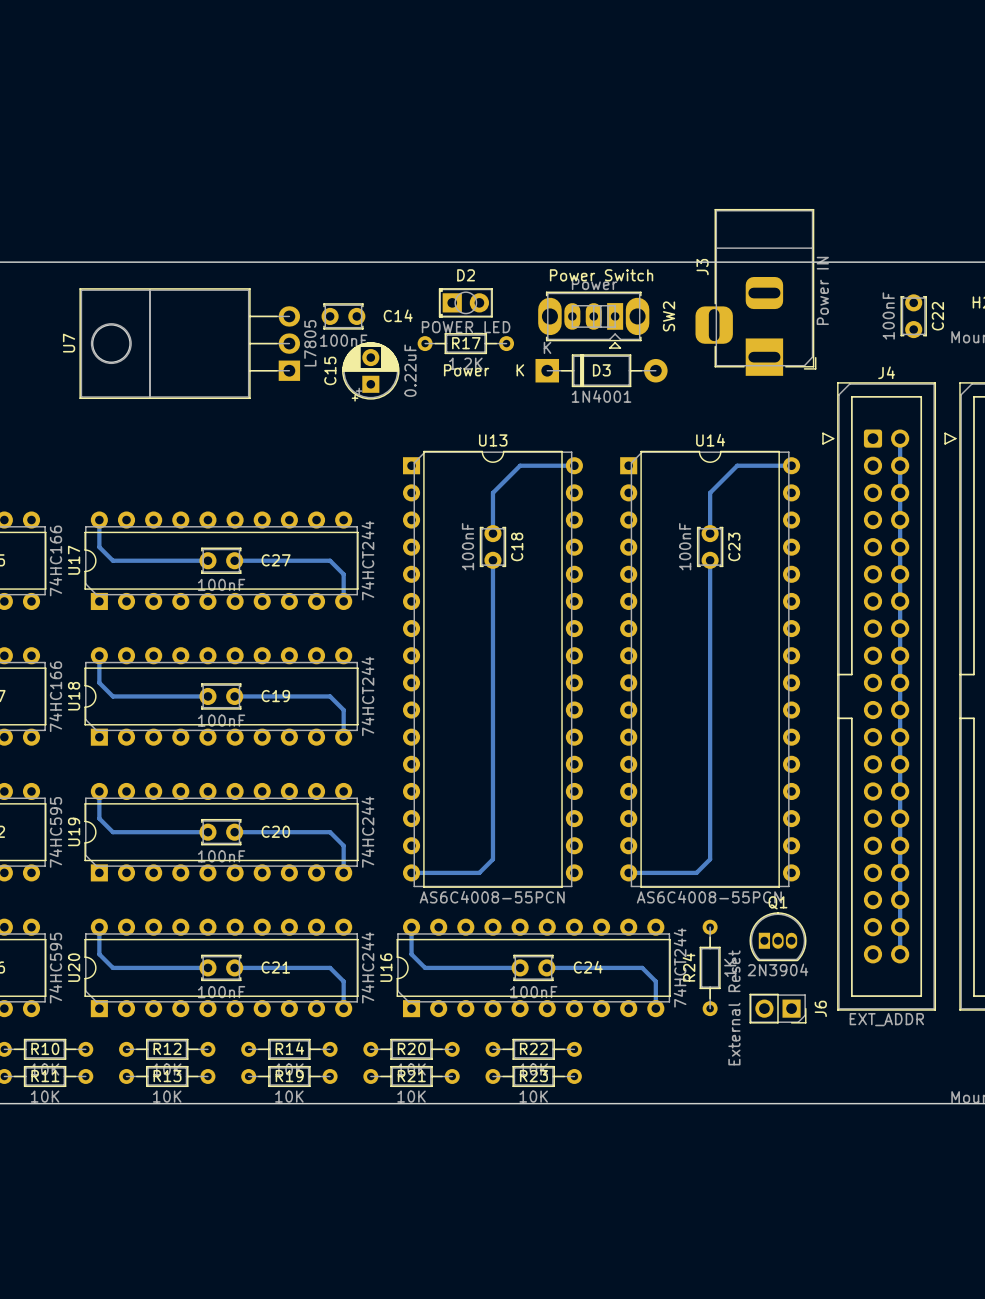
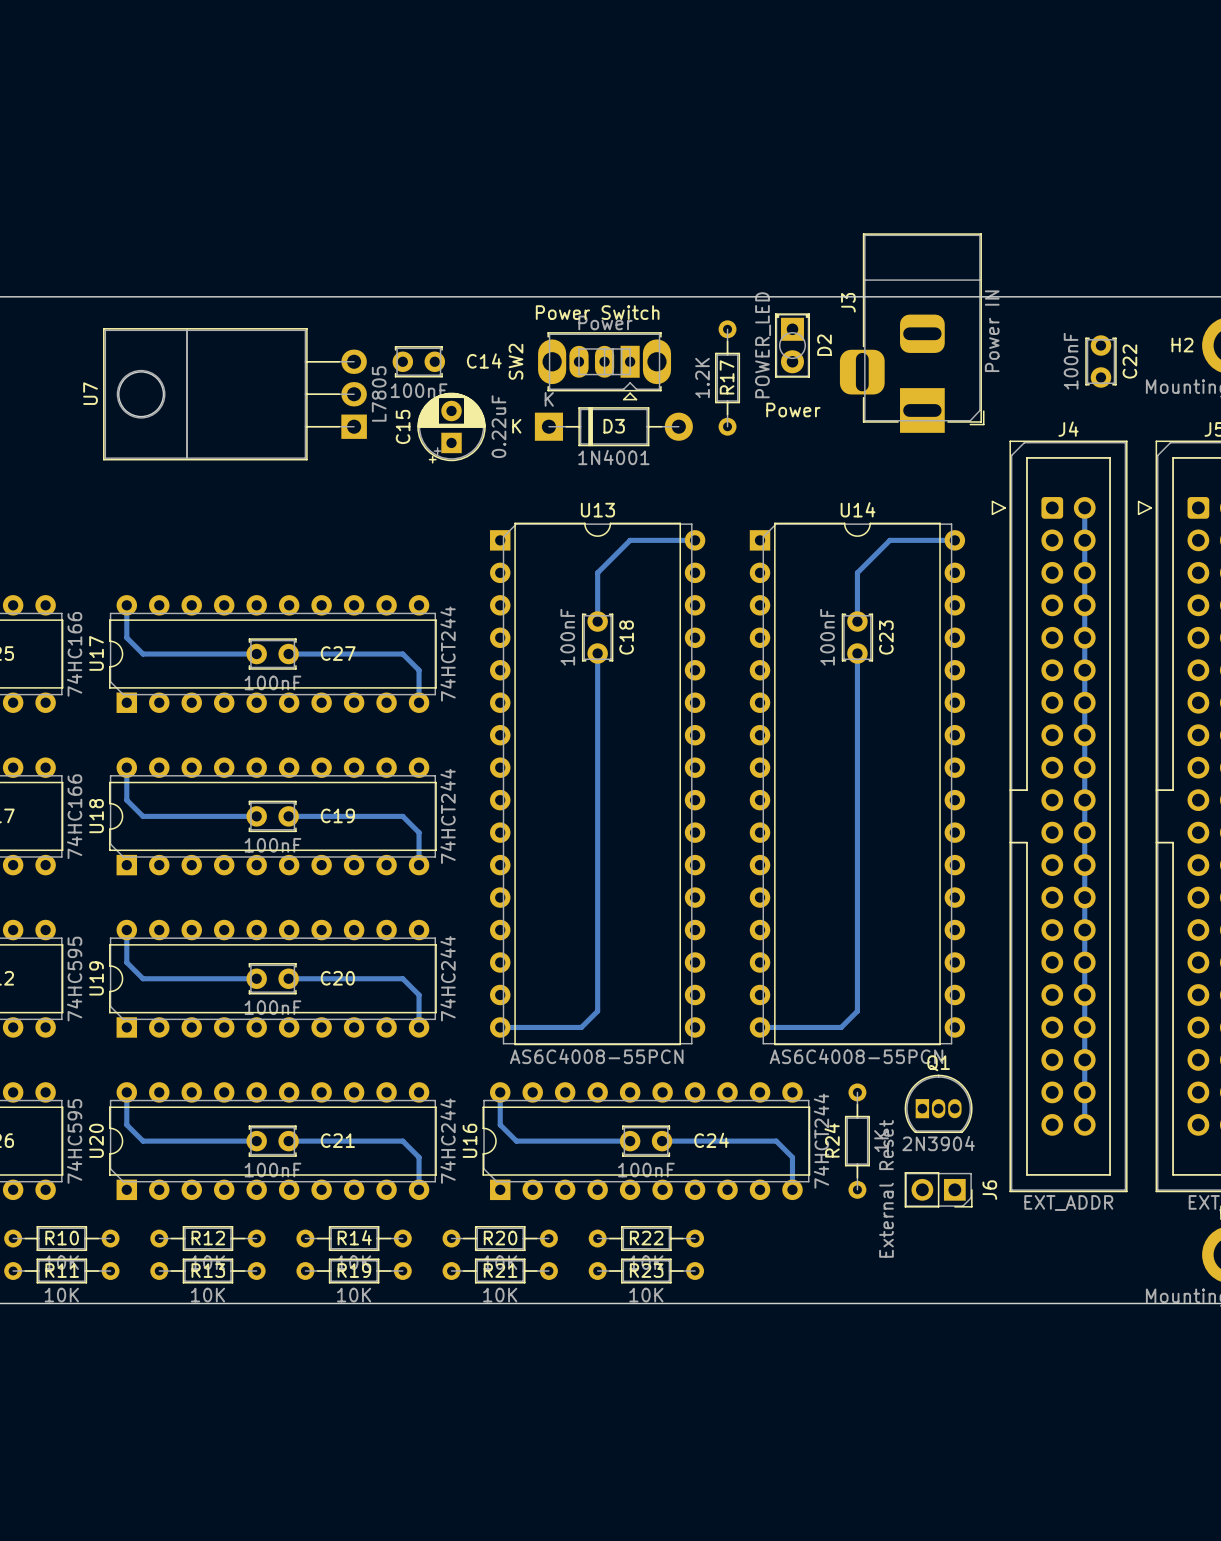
text position: Power Switch (601, 275) -> Power Switch (597, 312)
D2 rotation: 0° (465, 302) -> 90° clockwise (792, 345)
D2 position: (465, 302) -> (792, 345)
SW2 name position: SW2 (669, 316) -> SW2 (515, 361)
SW2 position: (593, 320) -> (604, 366)
R17 rotation: 0° (465, 343) -> 90° clockwise (727, 378)
R17 position: (465, 343) -> (727, 378)
text position: Power (466, 370) -> Power (793, 410)
D3 position: (601, 370) -> (613, 426)

